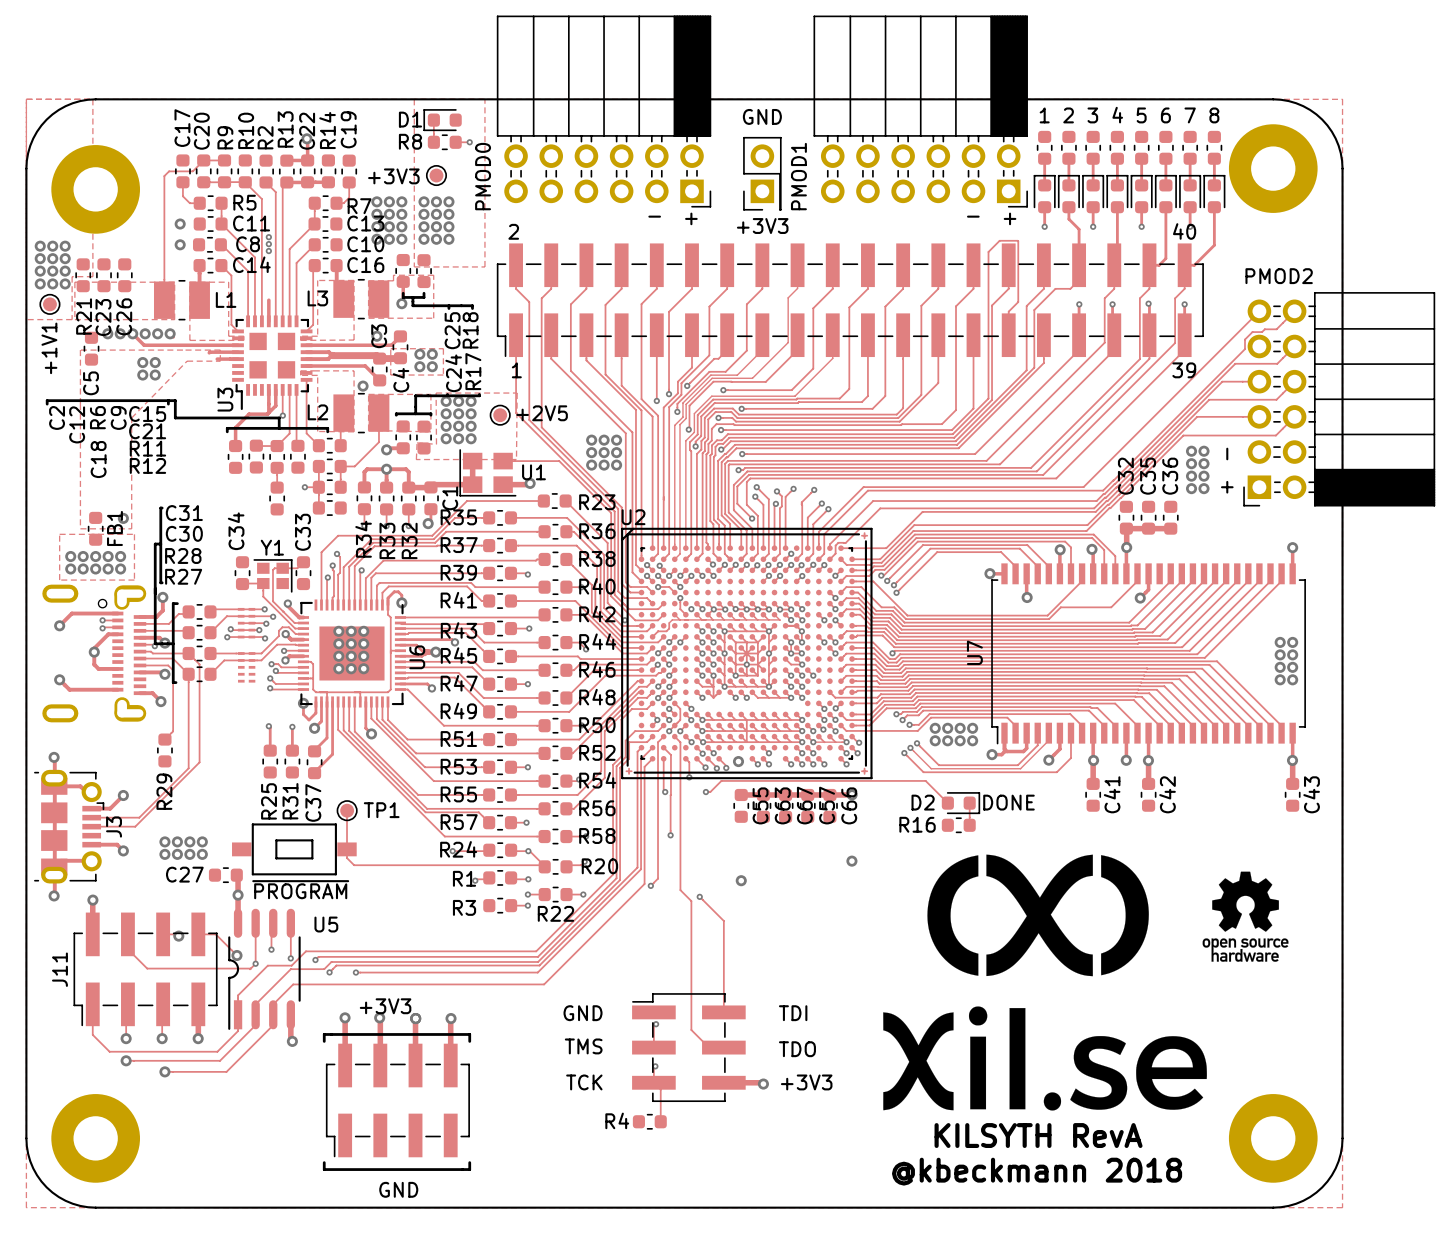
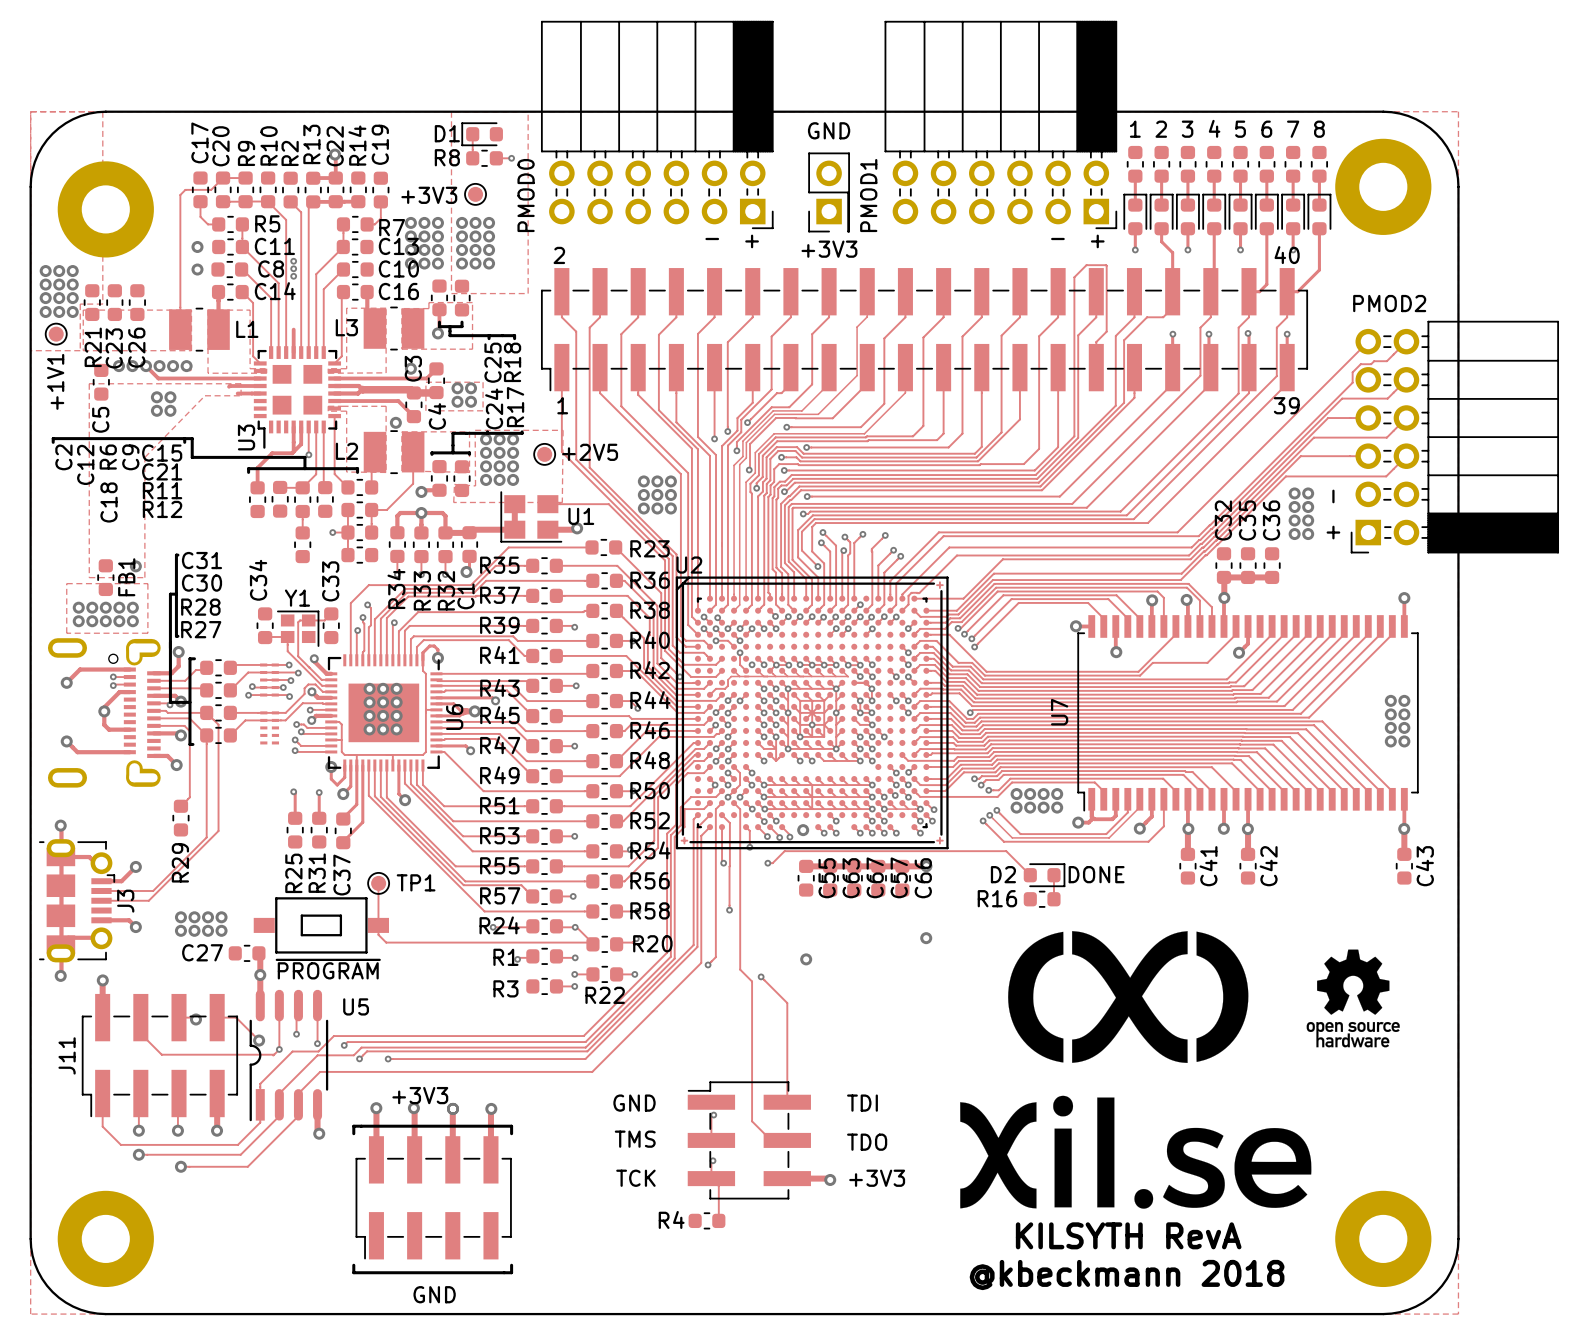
C1 name position: C1 (450, 498) -> C1 (465, 596)

